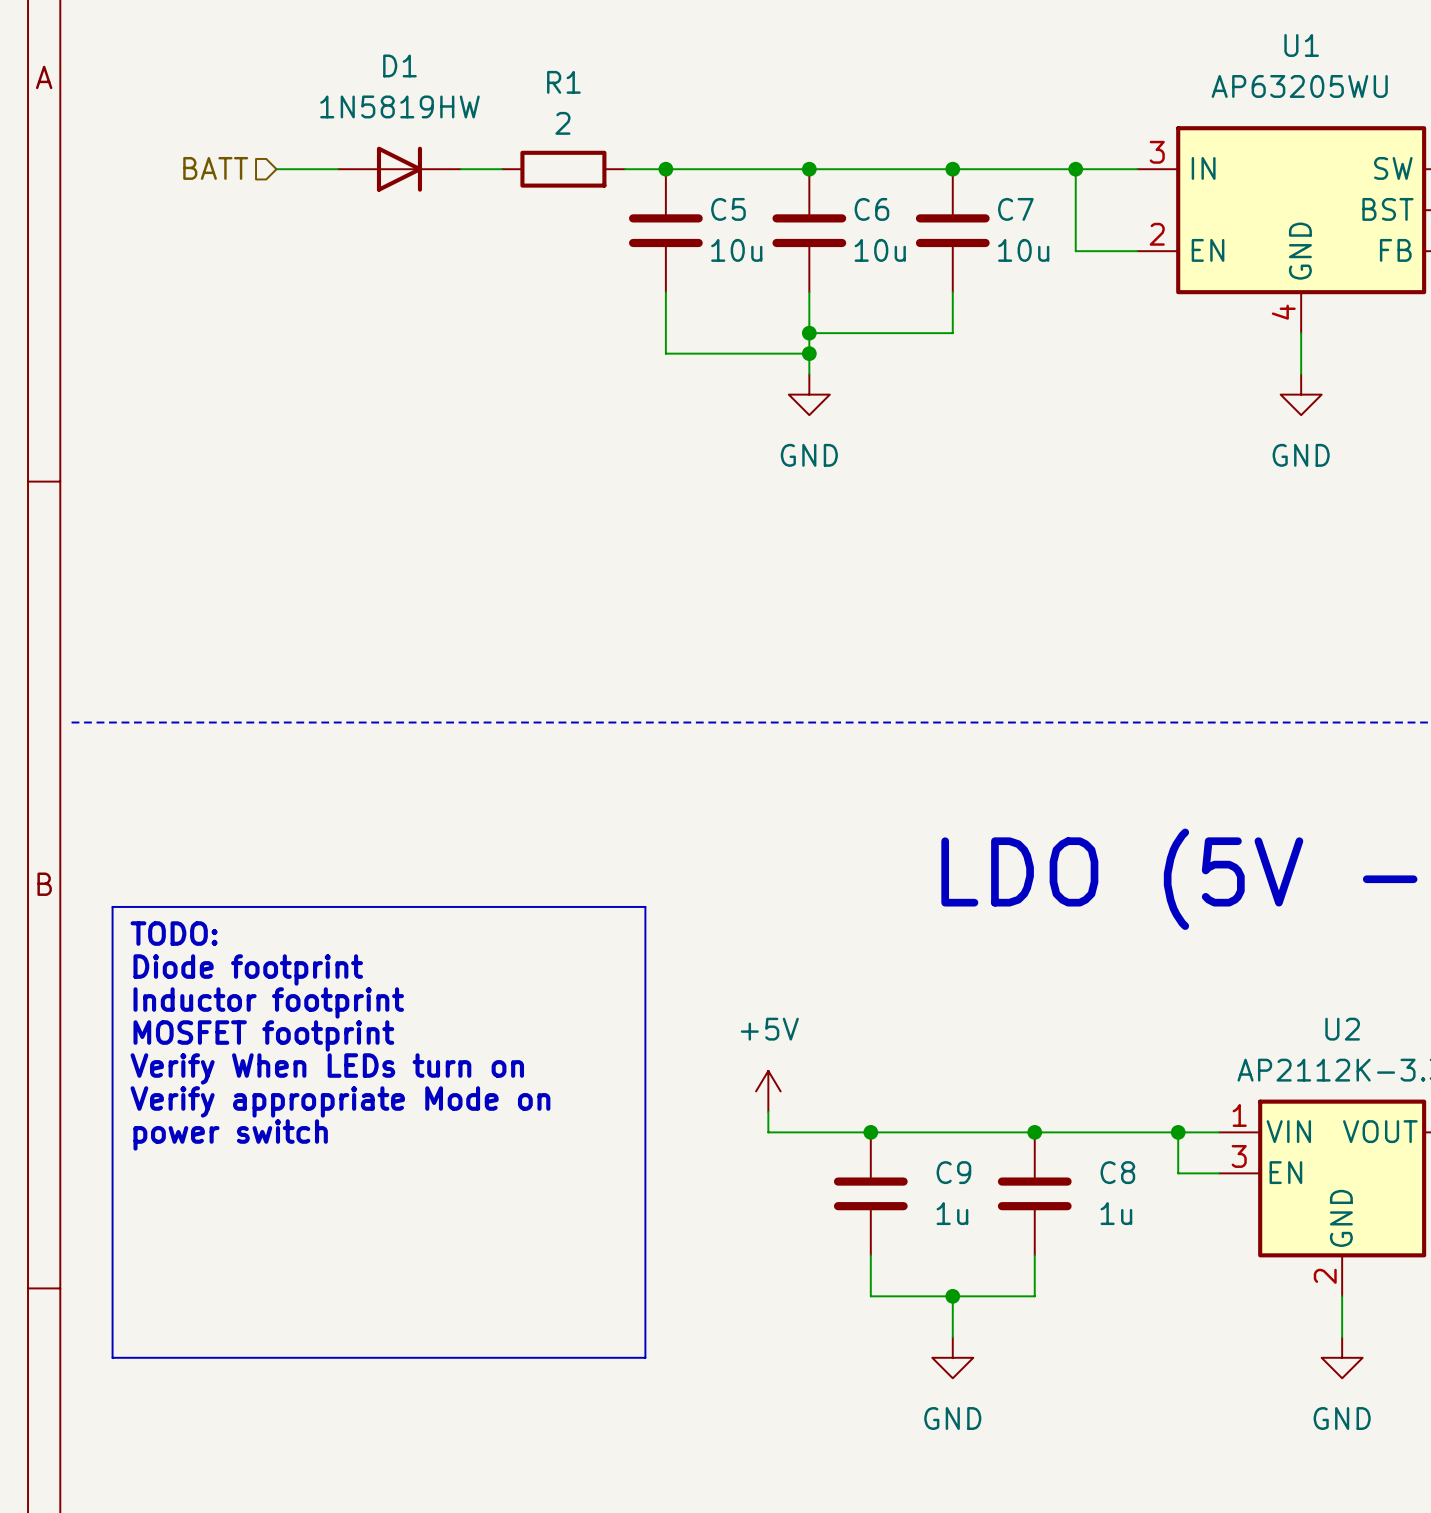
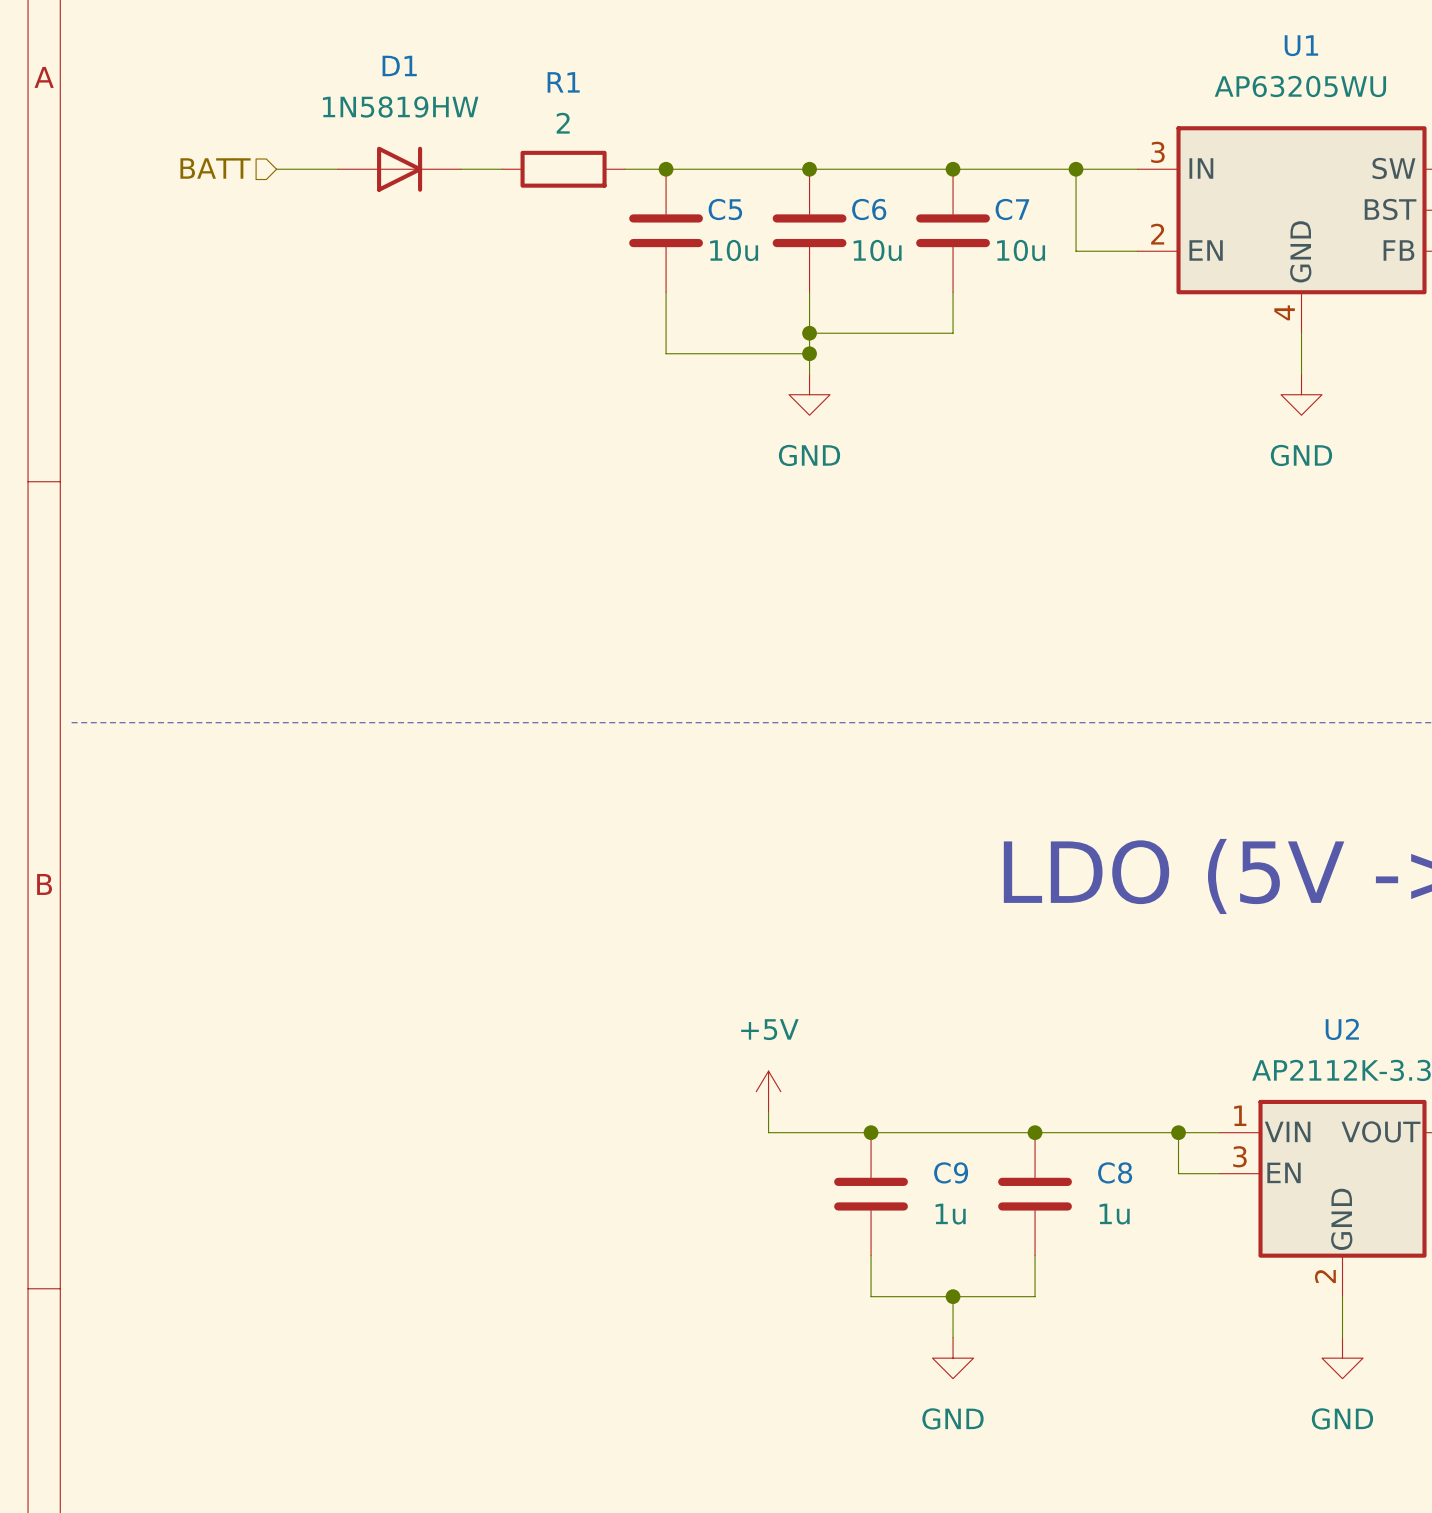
line: (112, 906) (645, 906) (645, 1357) (112, 1357) (112, 906) -> none
text: TODO: (174, 933) -> none
text: Diode footprint (248, 969) -> none
text: Inductor footprint (268, 1002) -> none
text: MOSFET footprint (263, 1035) -> none
text: Verify When LEDs turn on (327, 1068) -> none
text: Verify appropriate Mode on (340, 1101) -> none
text: power switch (230, 1134) -> none

